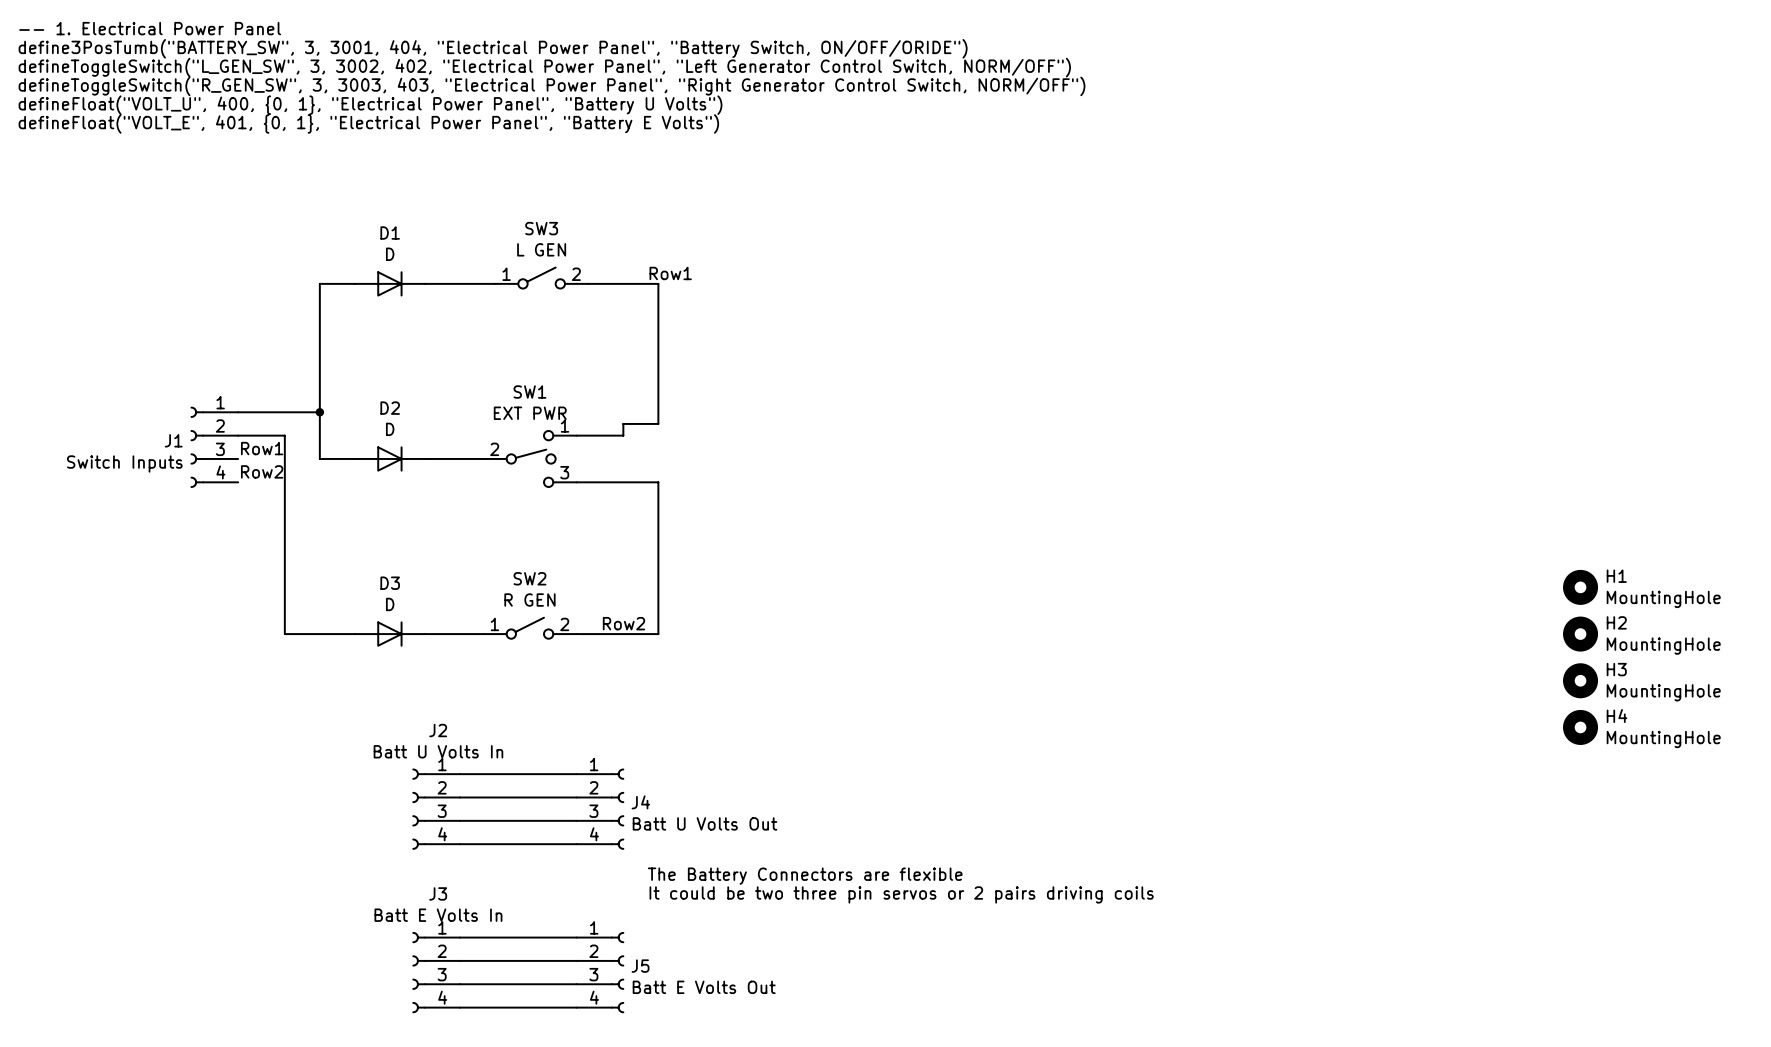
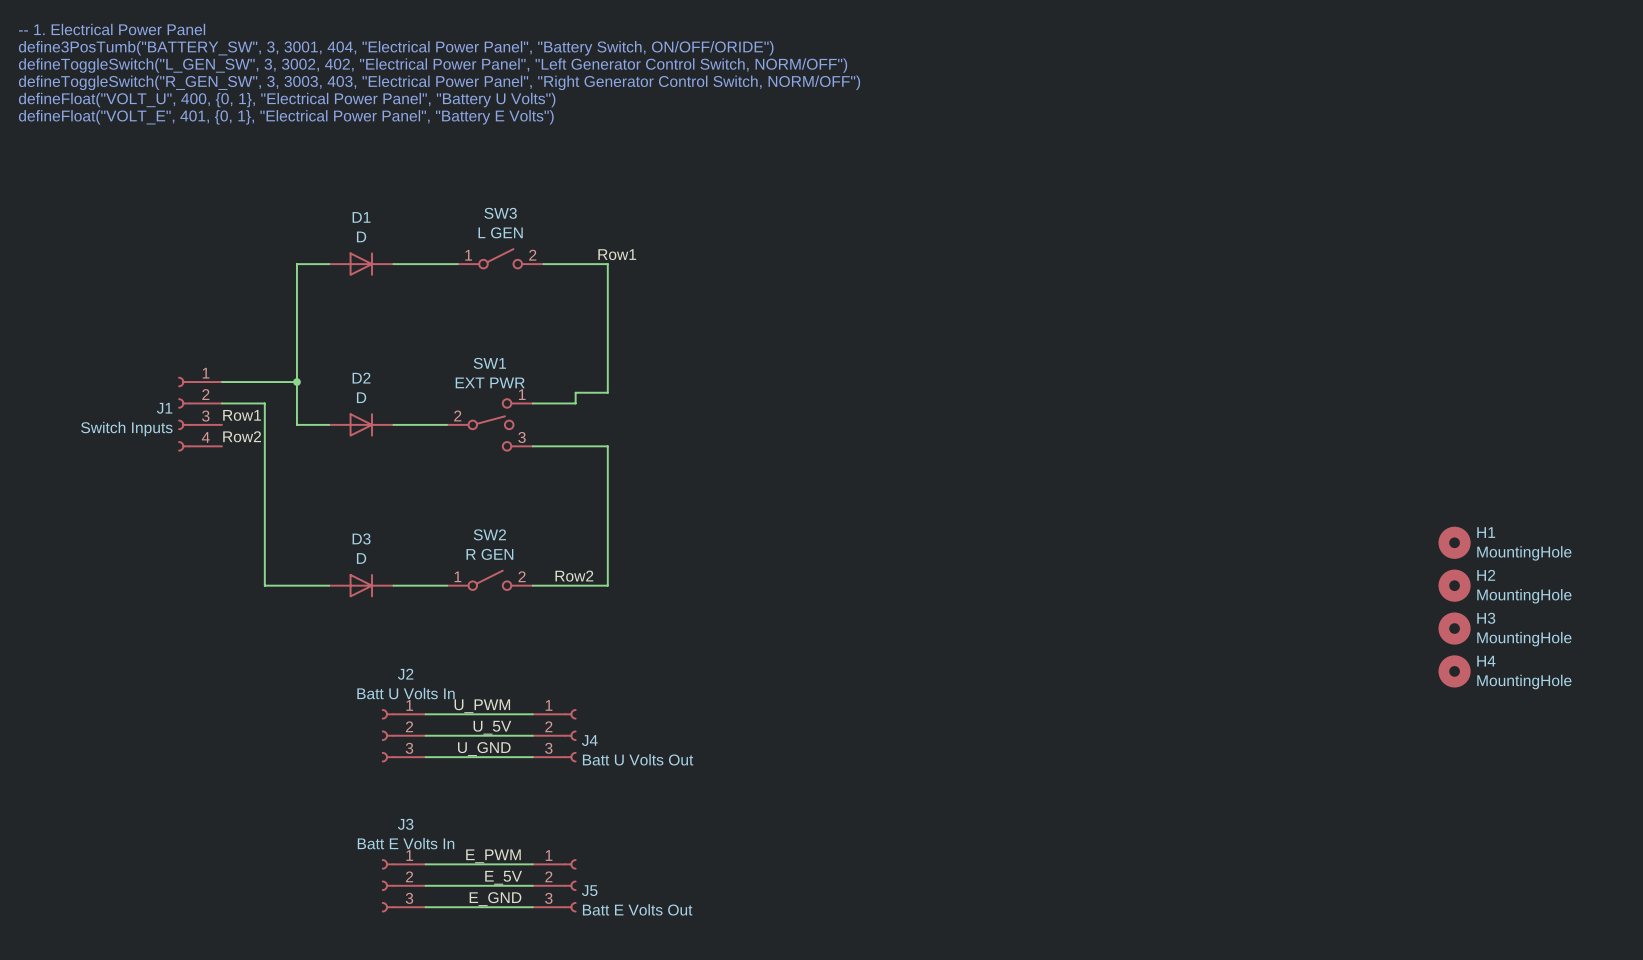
label: none -> U_PWM (482, 706)
J2 symbol: [412, 768, 460, 850] -> [382, 709, 426, 763]
J4 symbol: [576, 768, 625, 850] -> [532, 709, 577, 763]
label: none -> U_5V (492, 727)
label: none -> U_GND (484, 749)
wire: (459, 844) (576, 844) -> none
text: The Battery Connectors are flexible (805, 876) -> none
text: It could be two three pin servos or 2 pairs driving coils (901, 894) -> none
label: none -> E_PWM (493, 856)
J3 symbol: [412, 932, 460, 1013] -> [382, 859, 426, 913]
J5 symbol: [576, 932, 625, 1013] -> [532, 859, 577, 913]
label: none -> E_5V (503, 877)
label: none -> E_GND (495, 899)
wire: (459, 1007) (576, 1007) -> none

